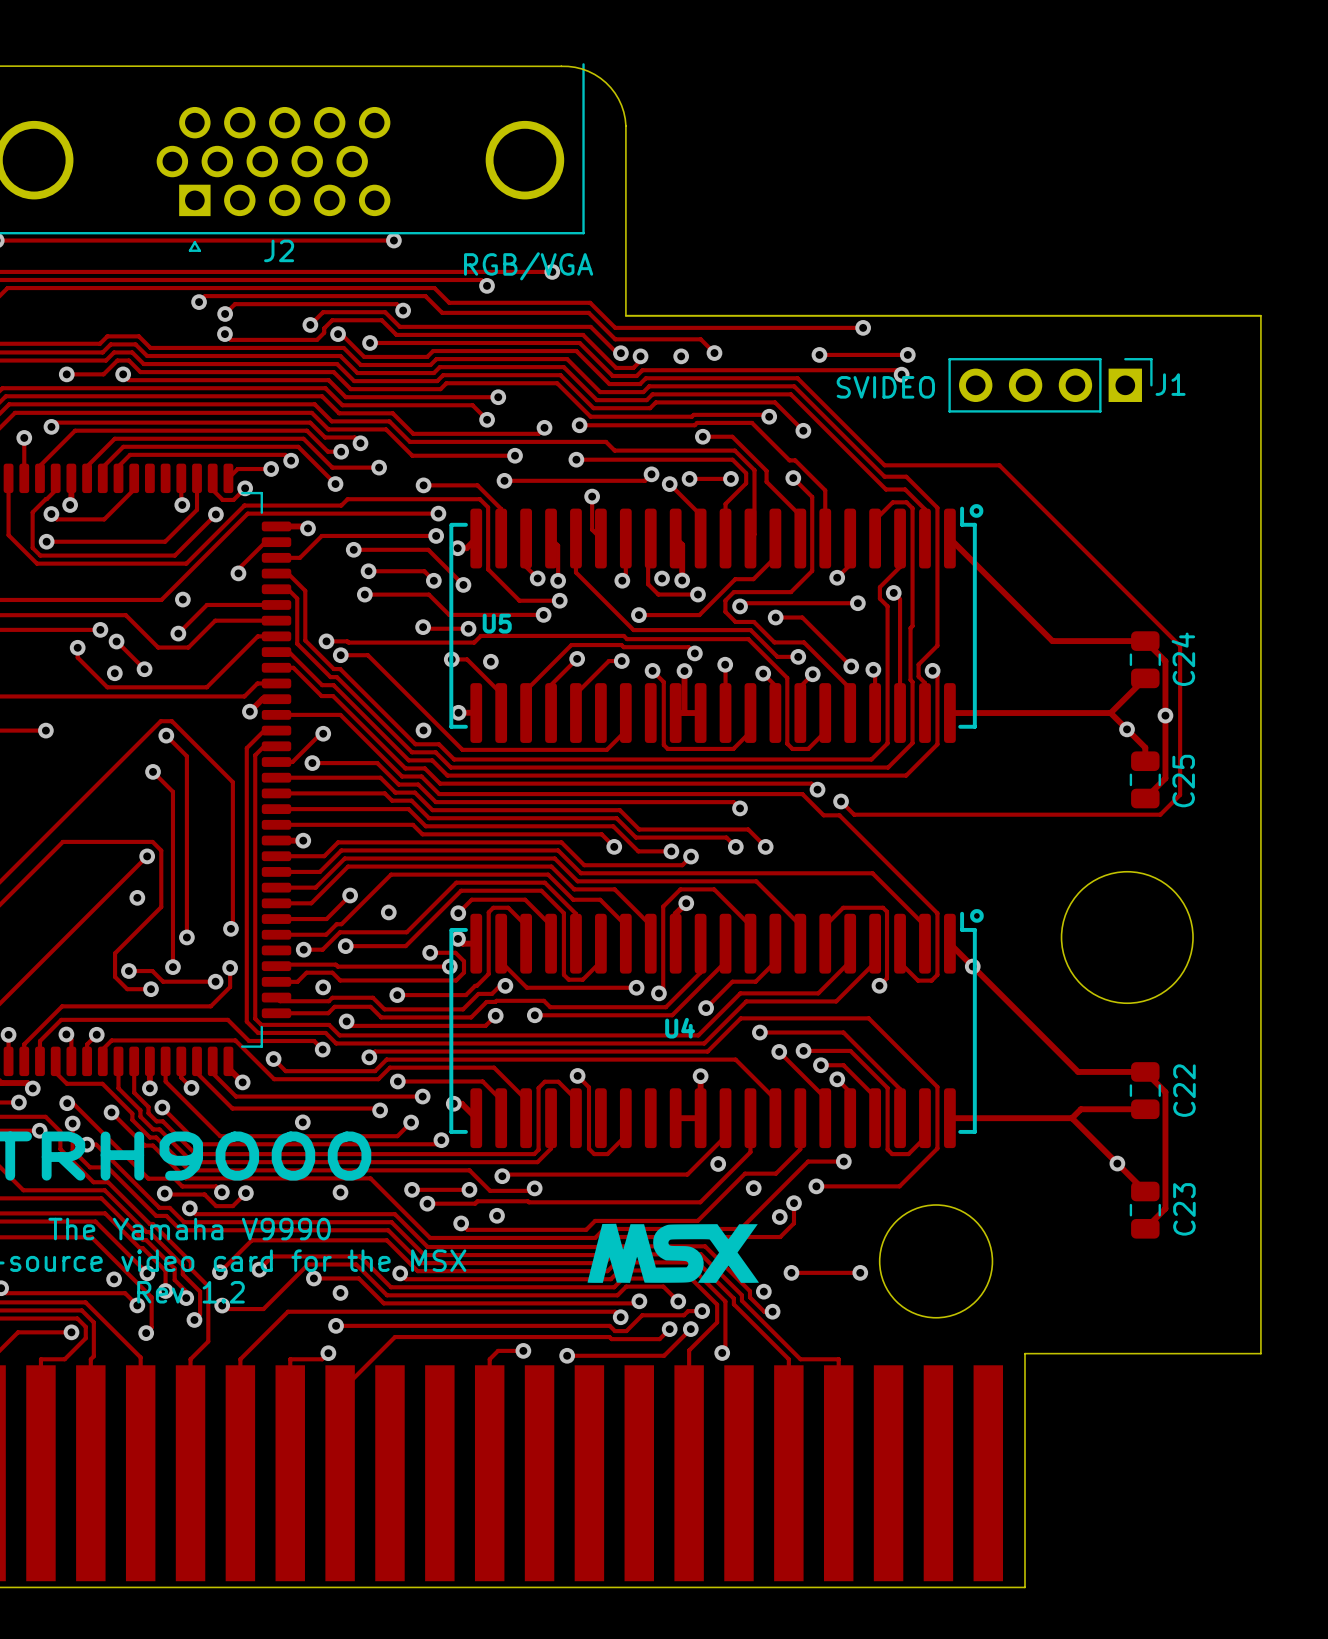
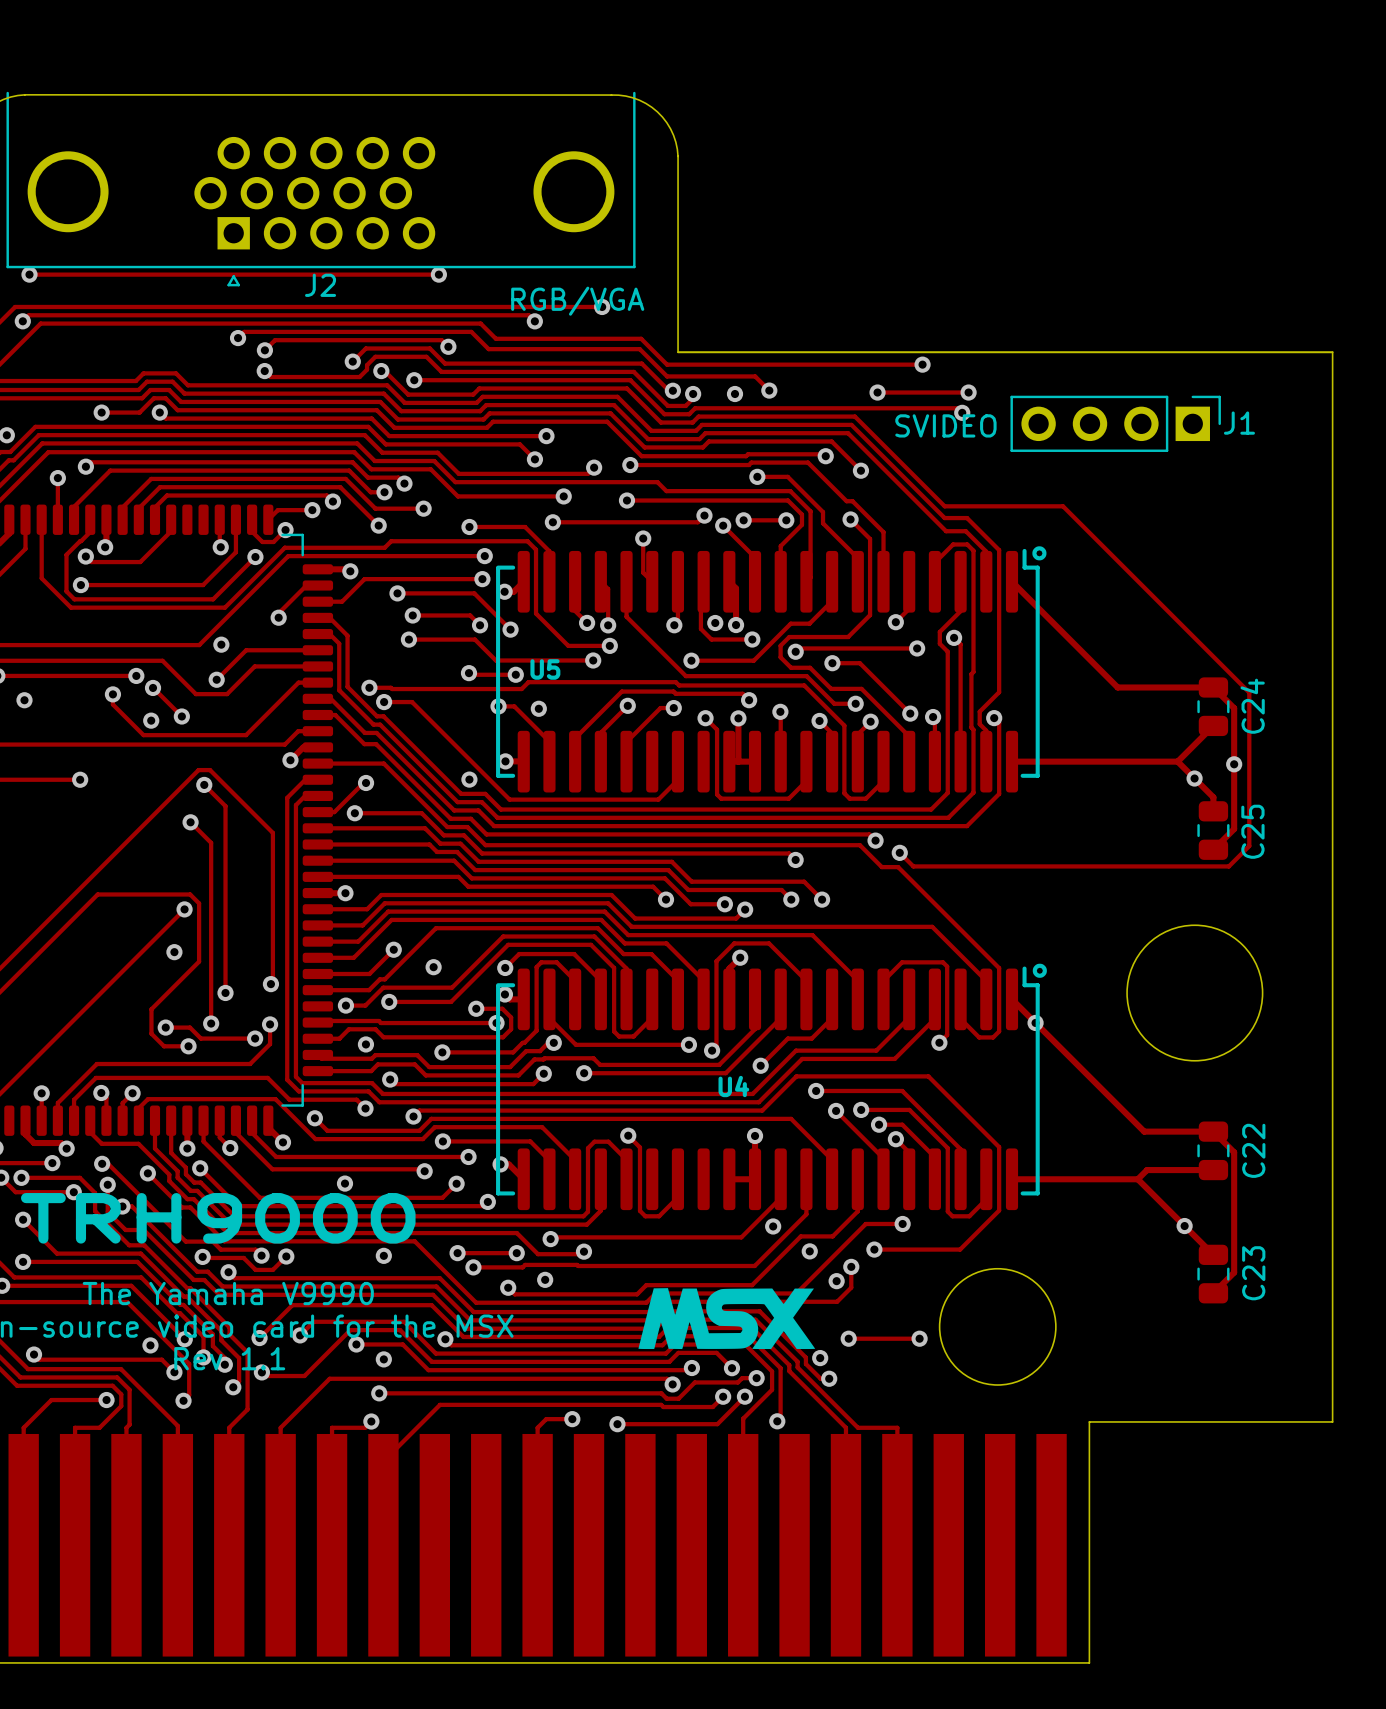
text: Rev 1.2 (191, 1292) -> Rev 1.1 (229, 1358)

